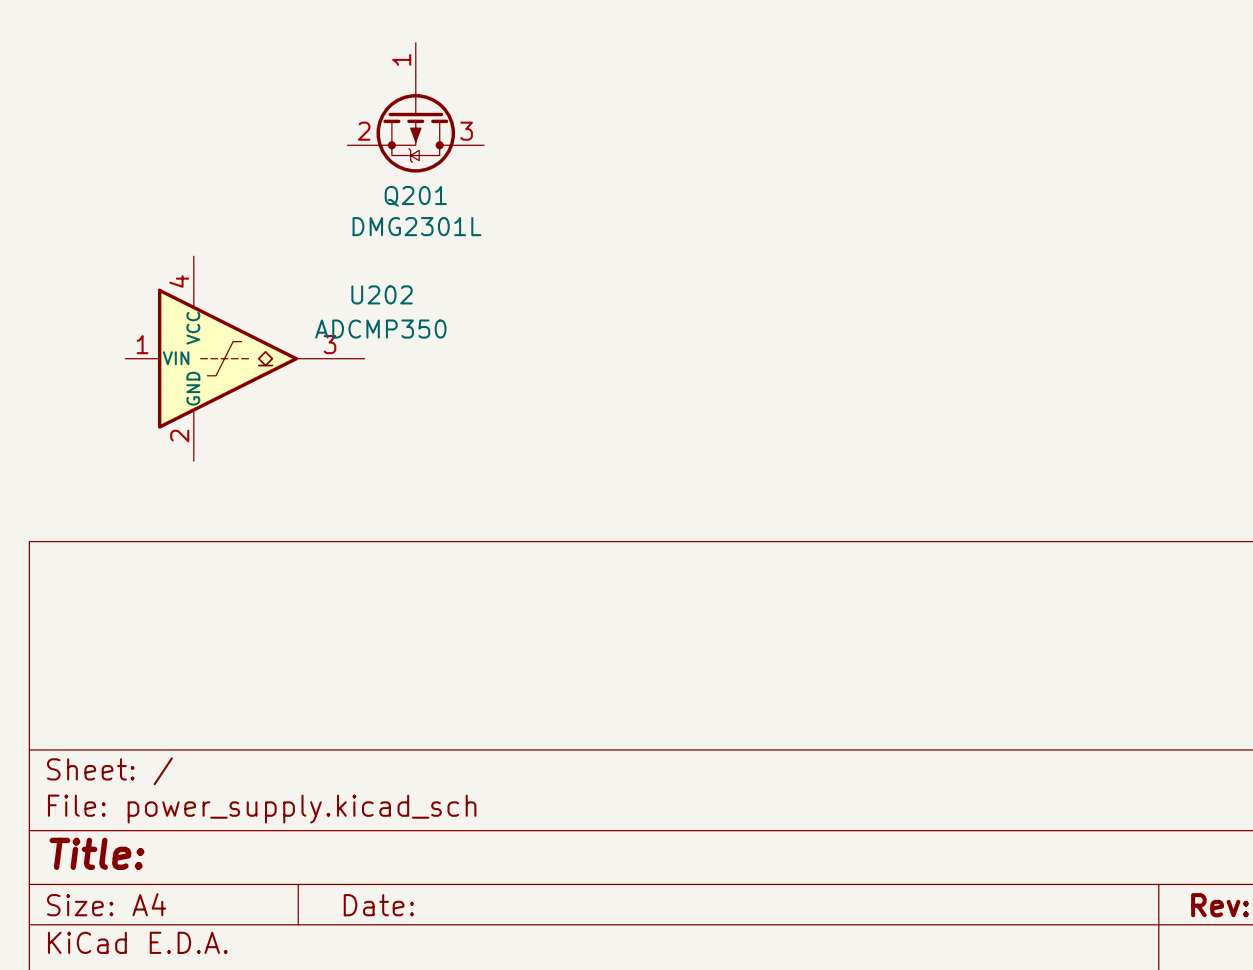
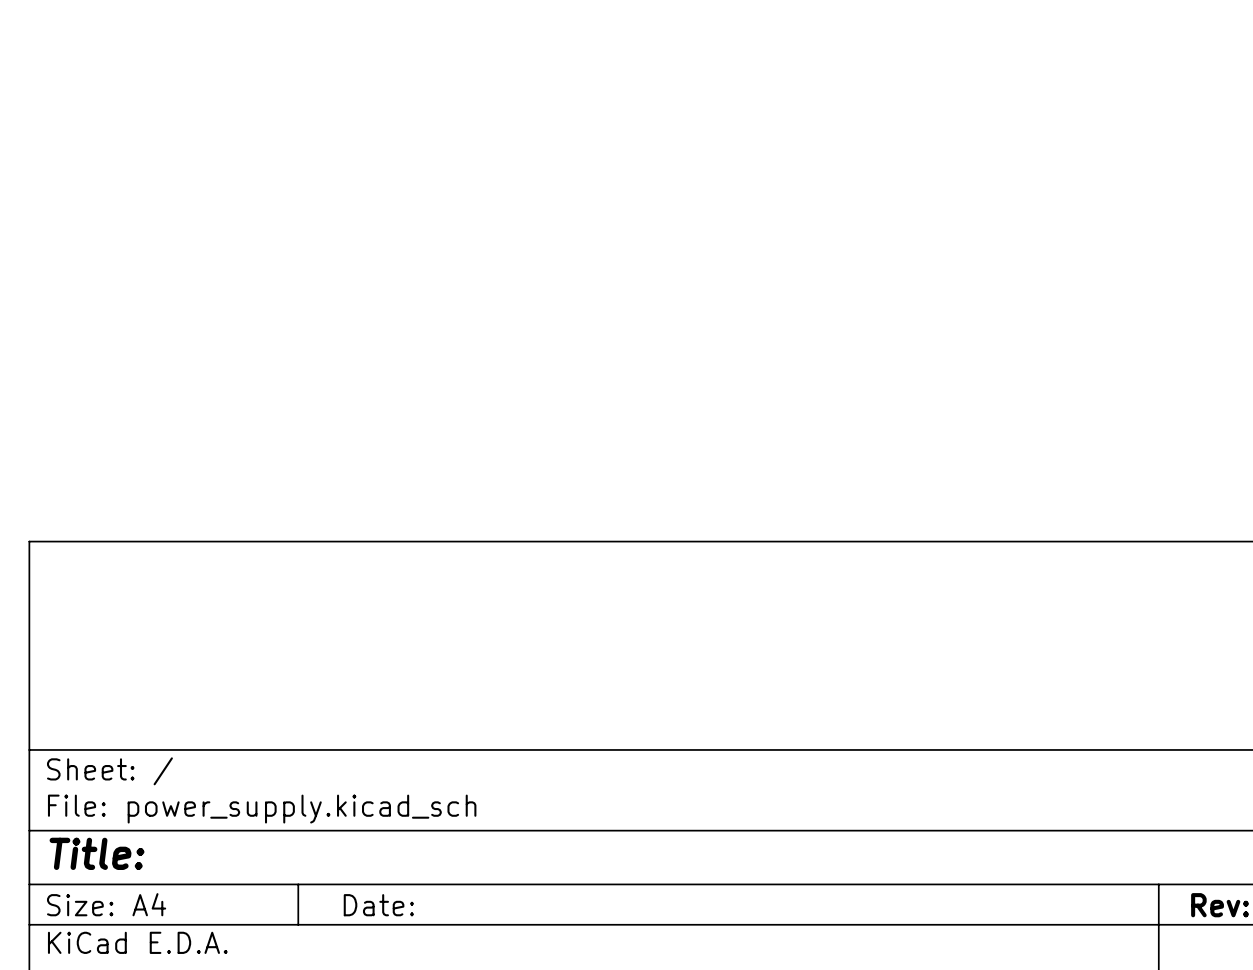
Q201: DMG2301L (415, 107) -> none
U202: ADCMP350 (245, 358) -> none

